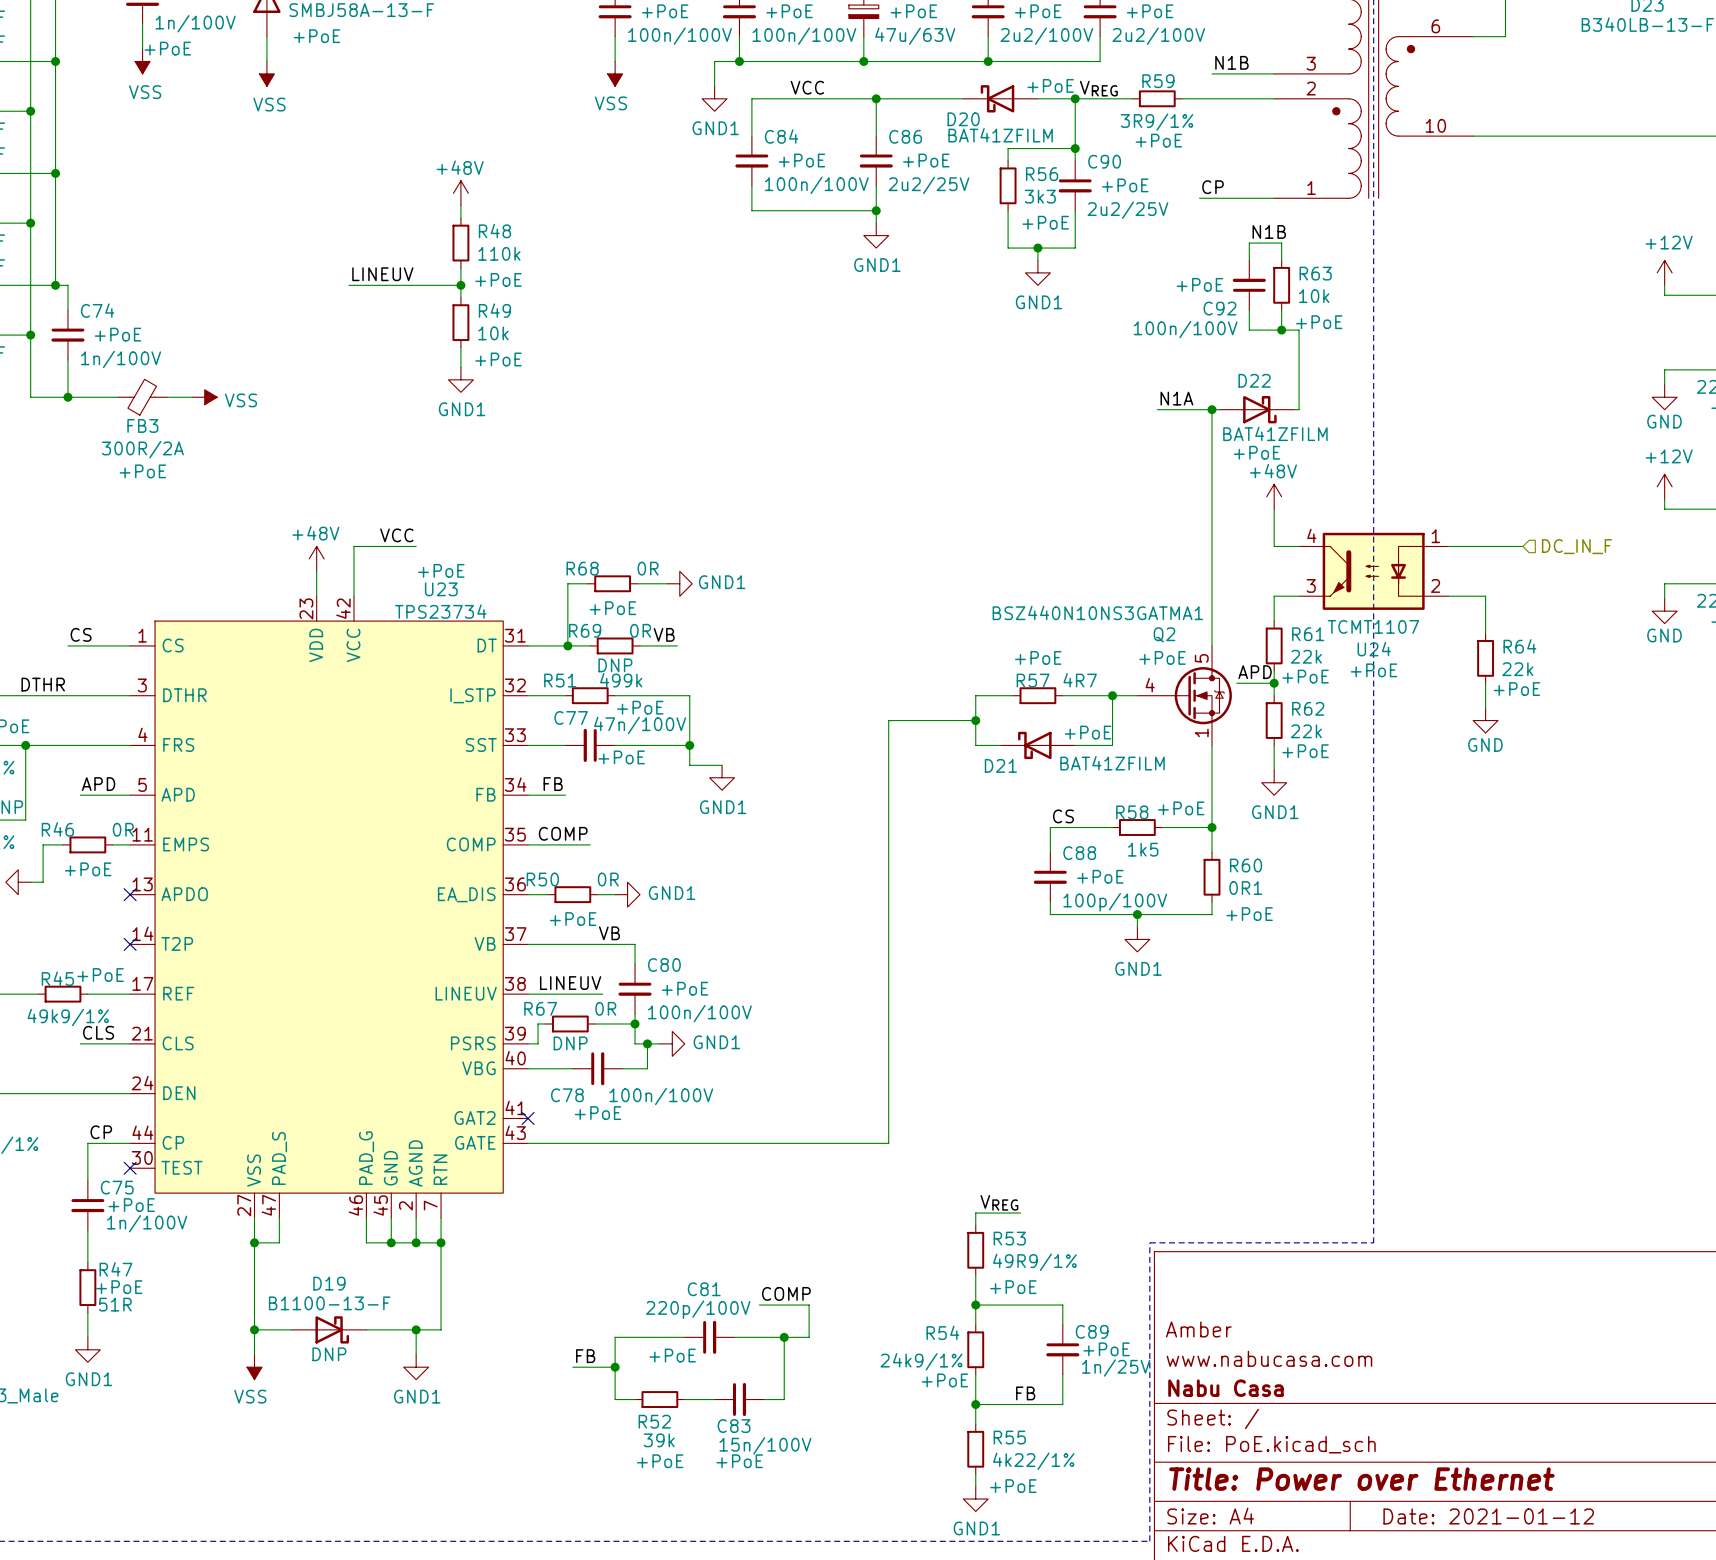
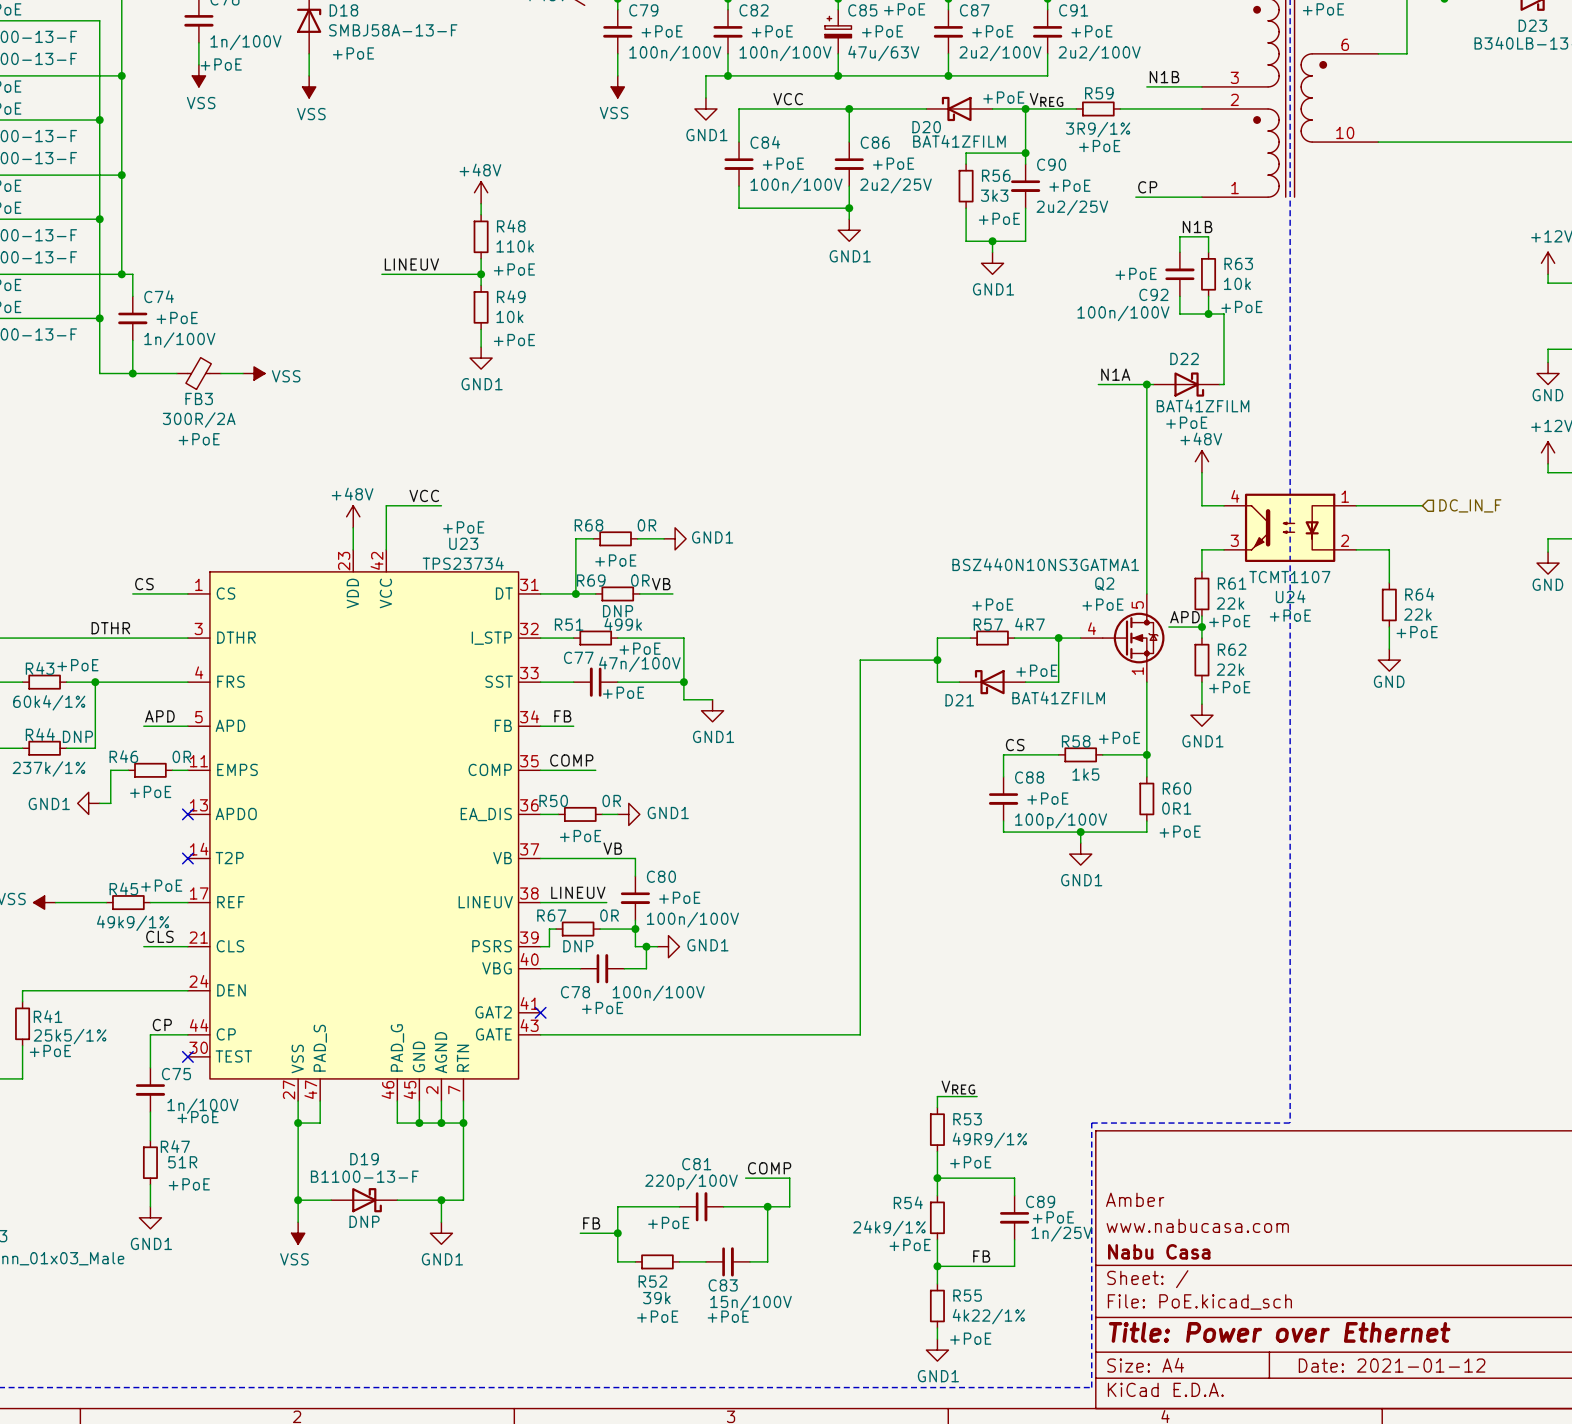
C75 text position: +PoE (131, 1205) -> +PoE (198, 1117)
R47 text position: +PoE (119, 1287) -> +PoE (189, 1184)
R47 value position: 51R (115, 1304) -> 51R (182, 1162)

